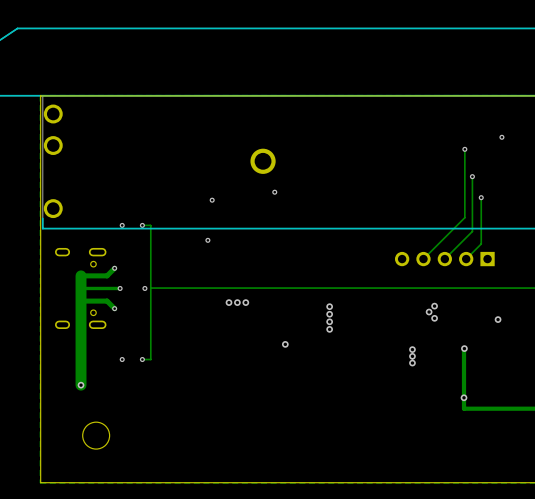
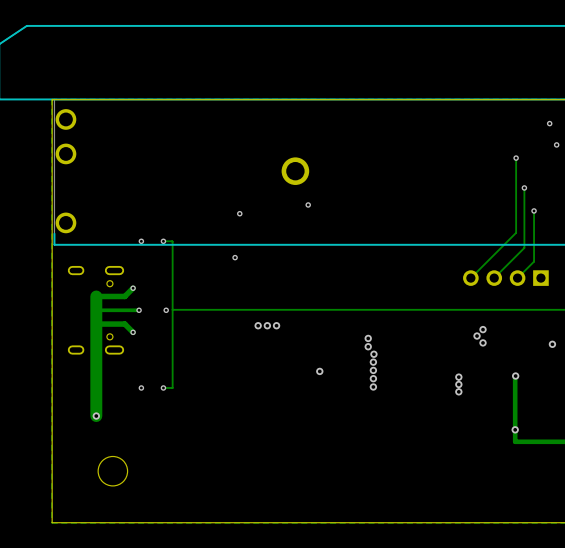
via: none -> (549, 123)
part: (444, 259) -> none
via: (329, 306) -> none
via: none -> (373, 354)
via: (329, 329) -> none
via: none -> (373, 362)
via: none -> (373, 370)
via: none -> (373, 378)
via: none -> (373, 386)

